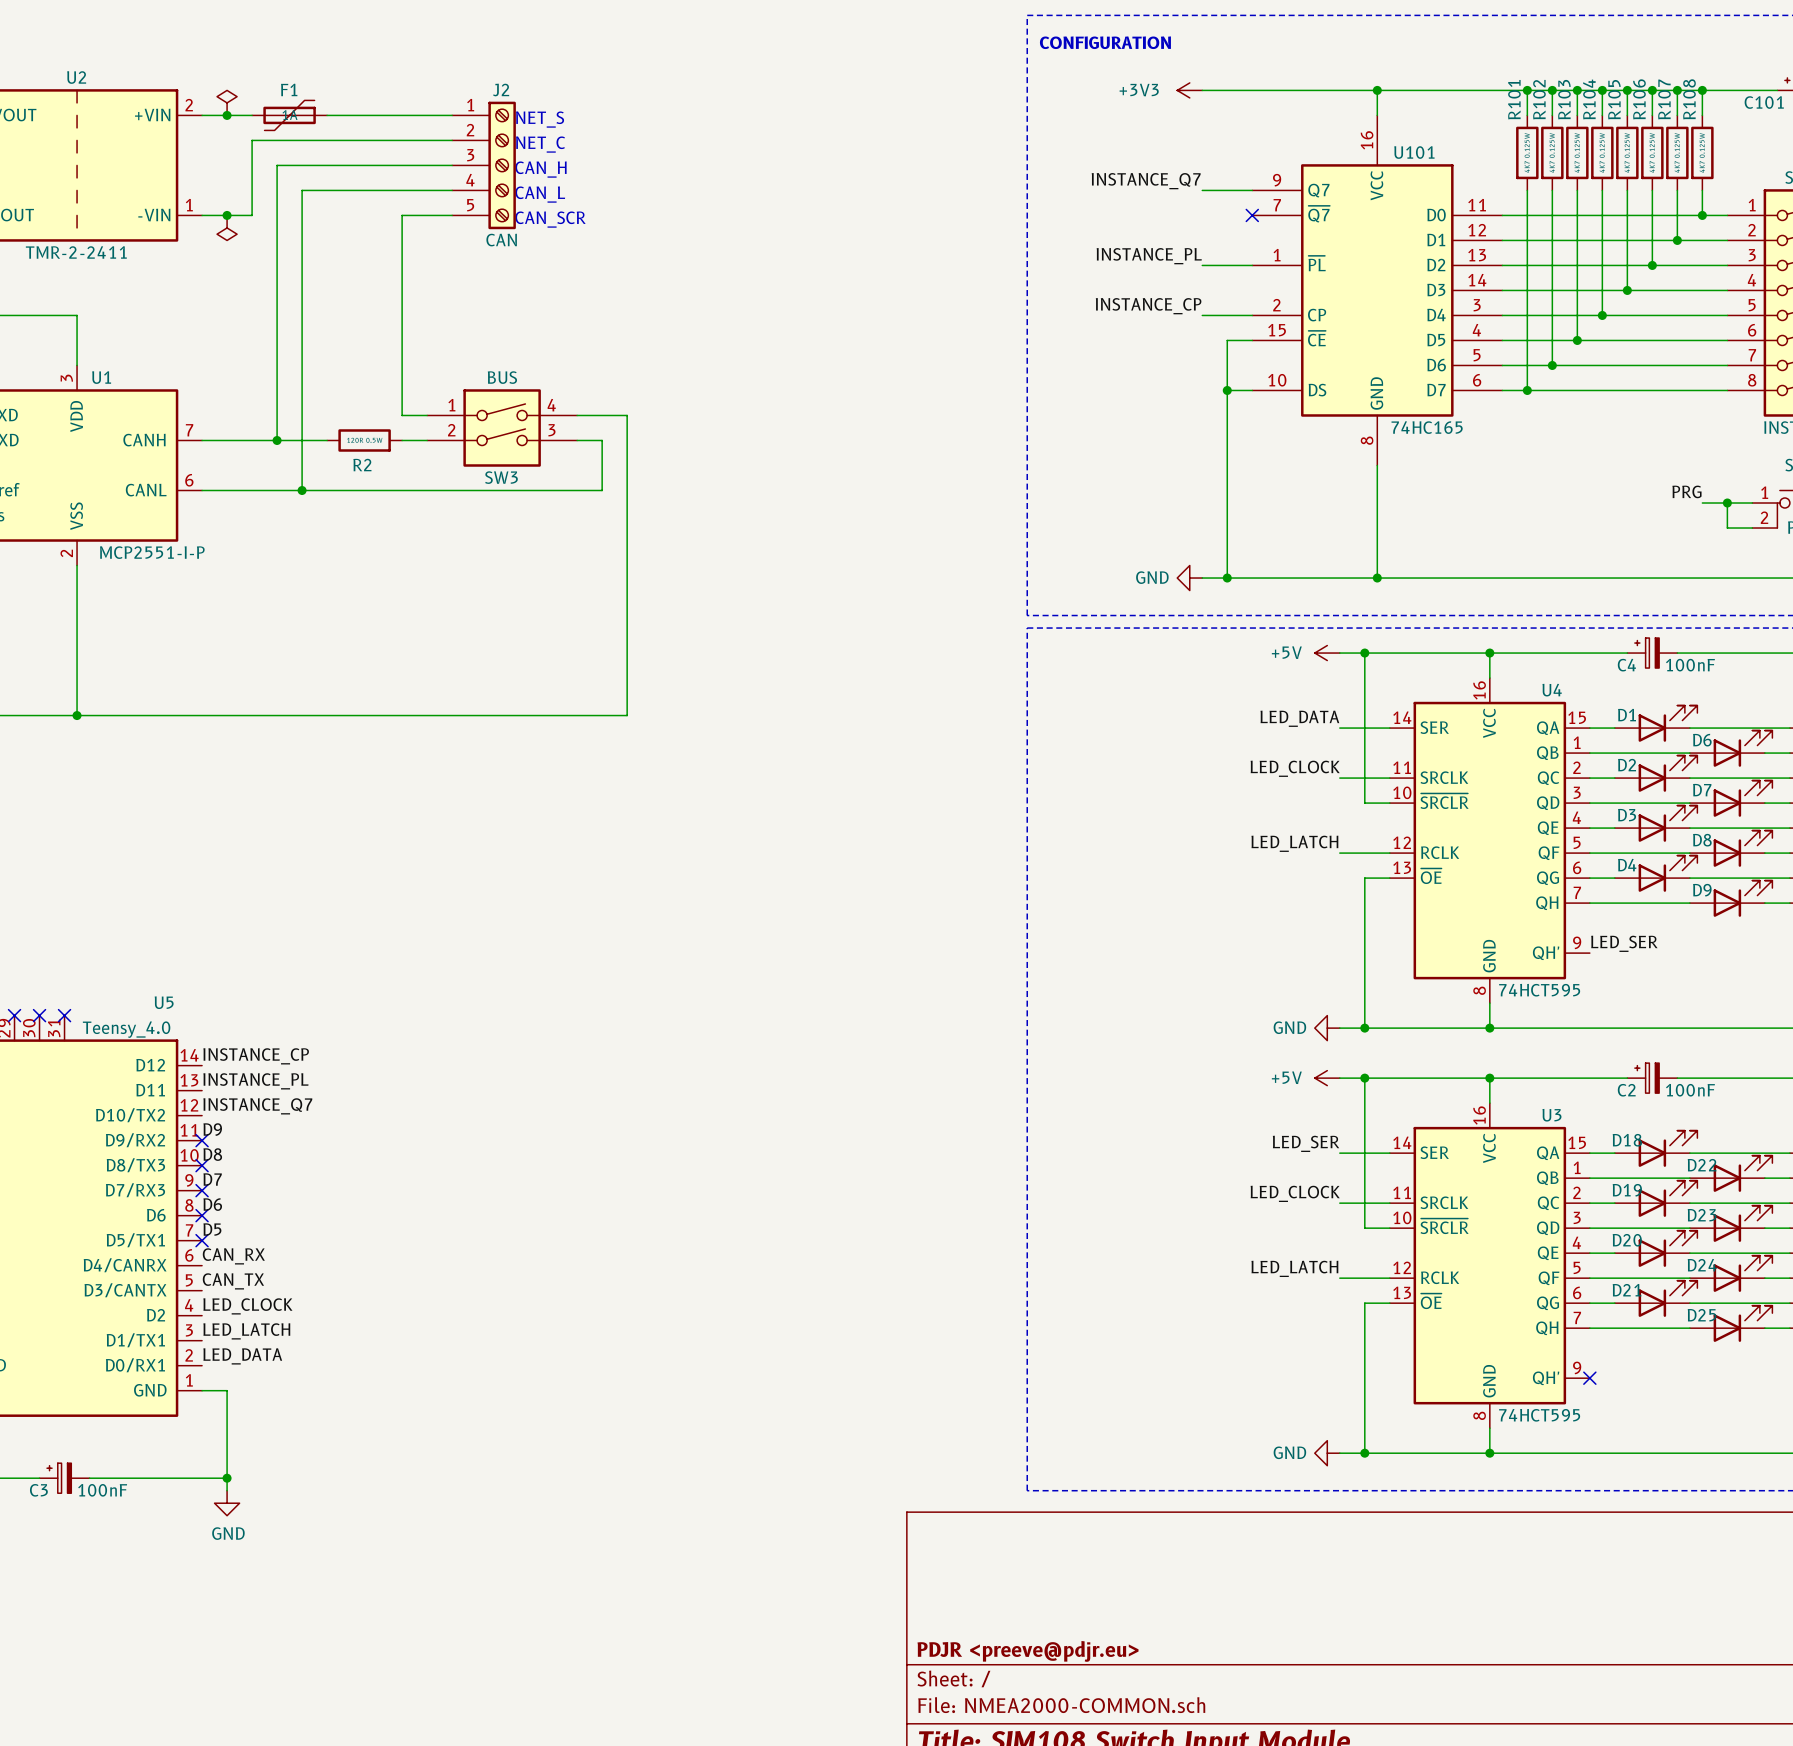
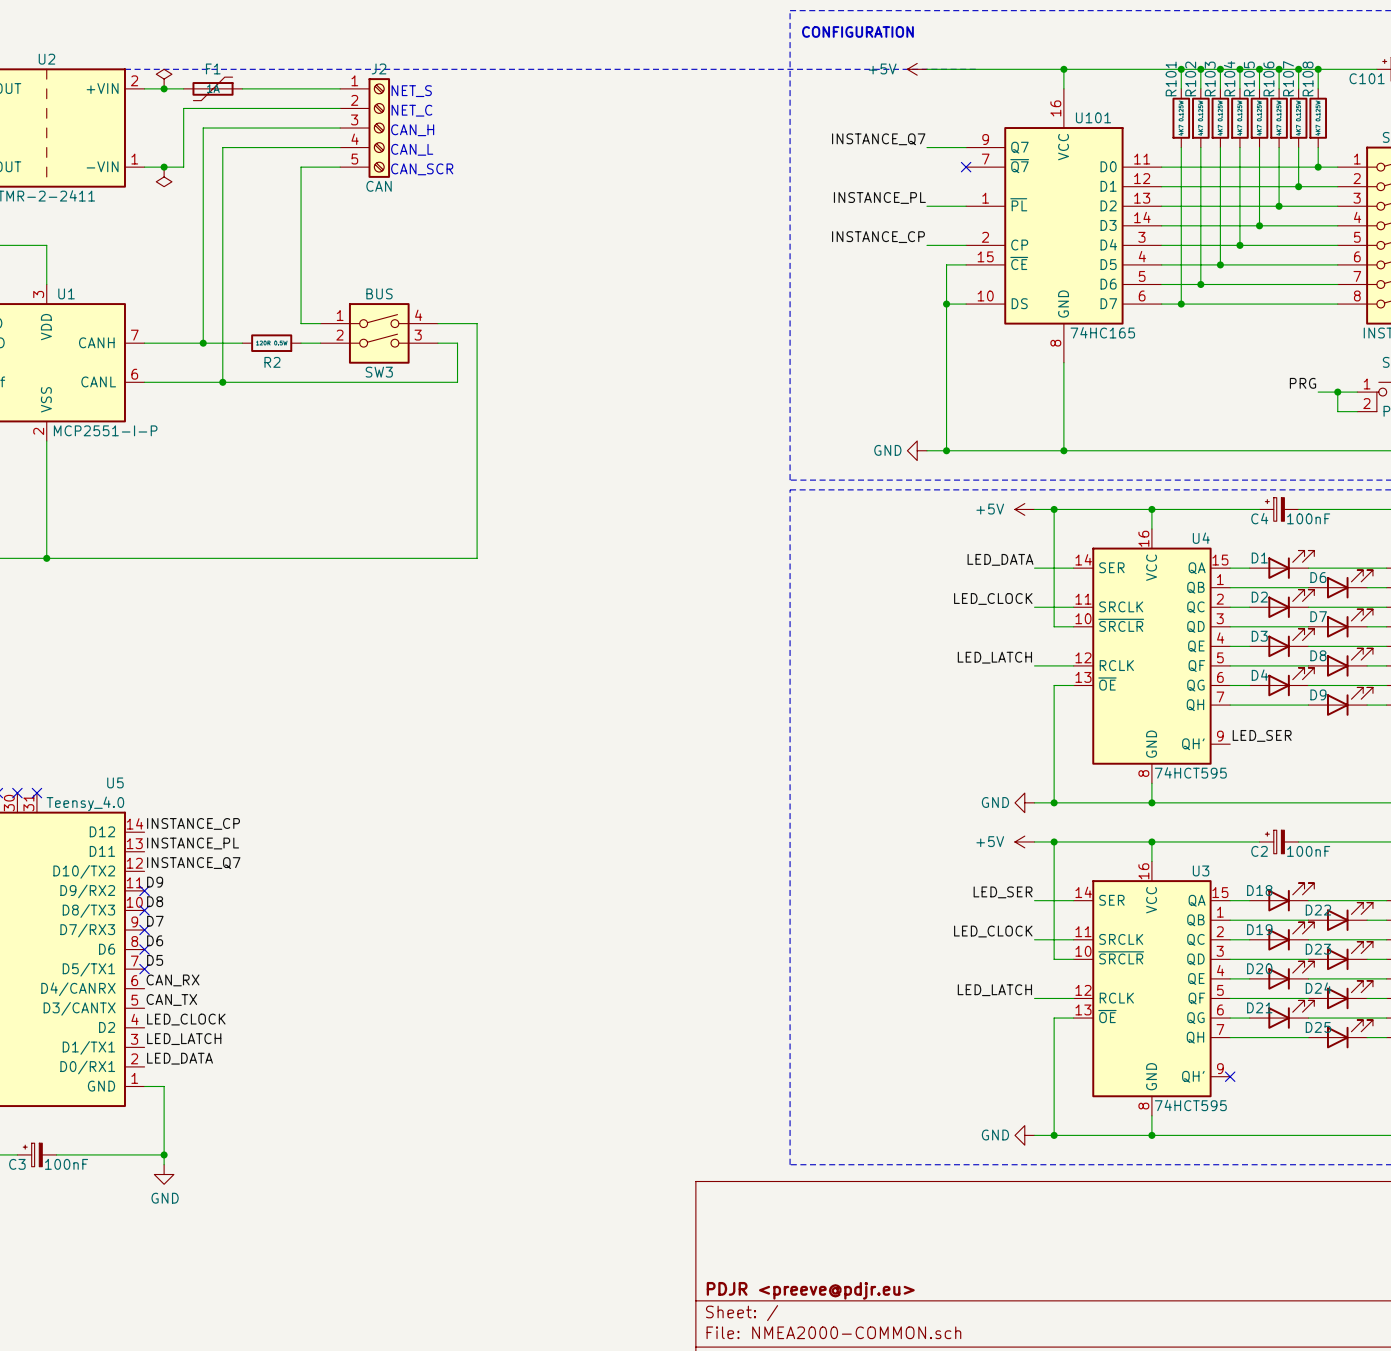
line: none -> (124, 69) (975, 69)
power symbol: +3V3 (1189, 90) -> +5V (917, 69)

